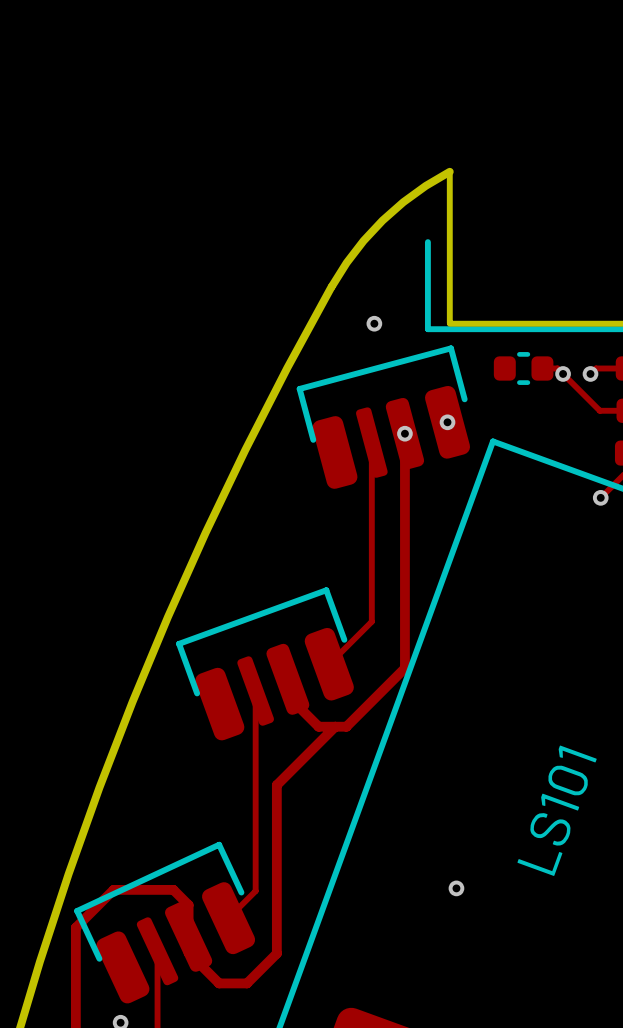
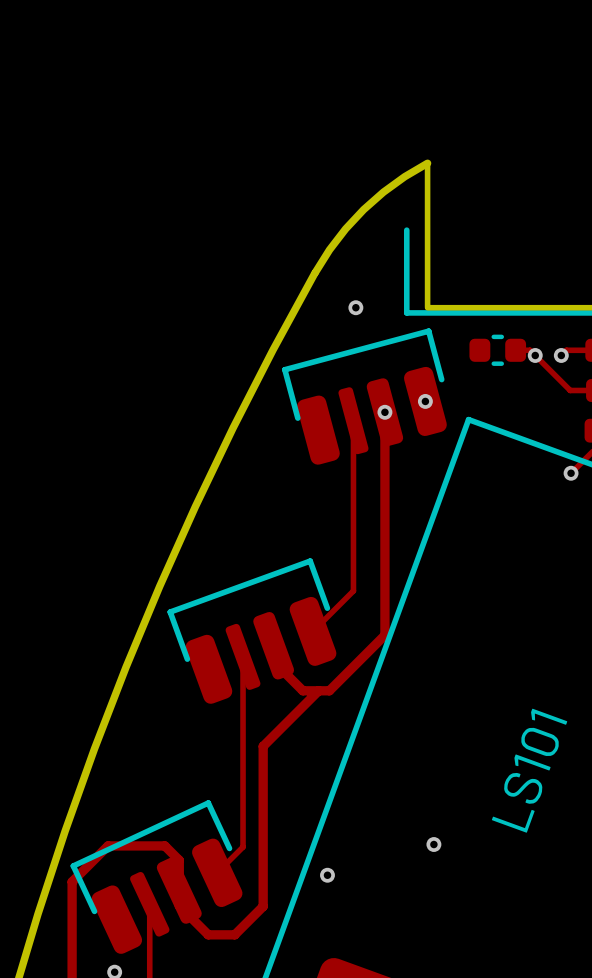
via: none -> (327, 875)

